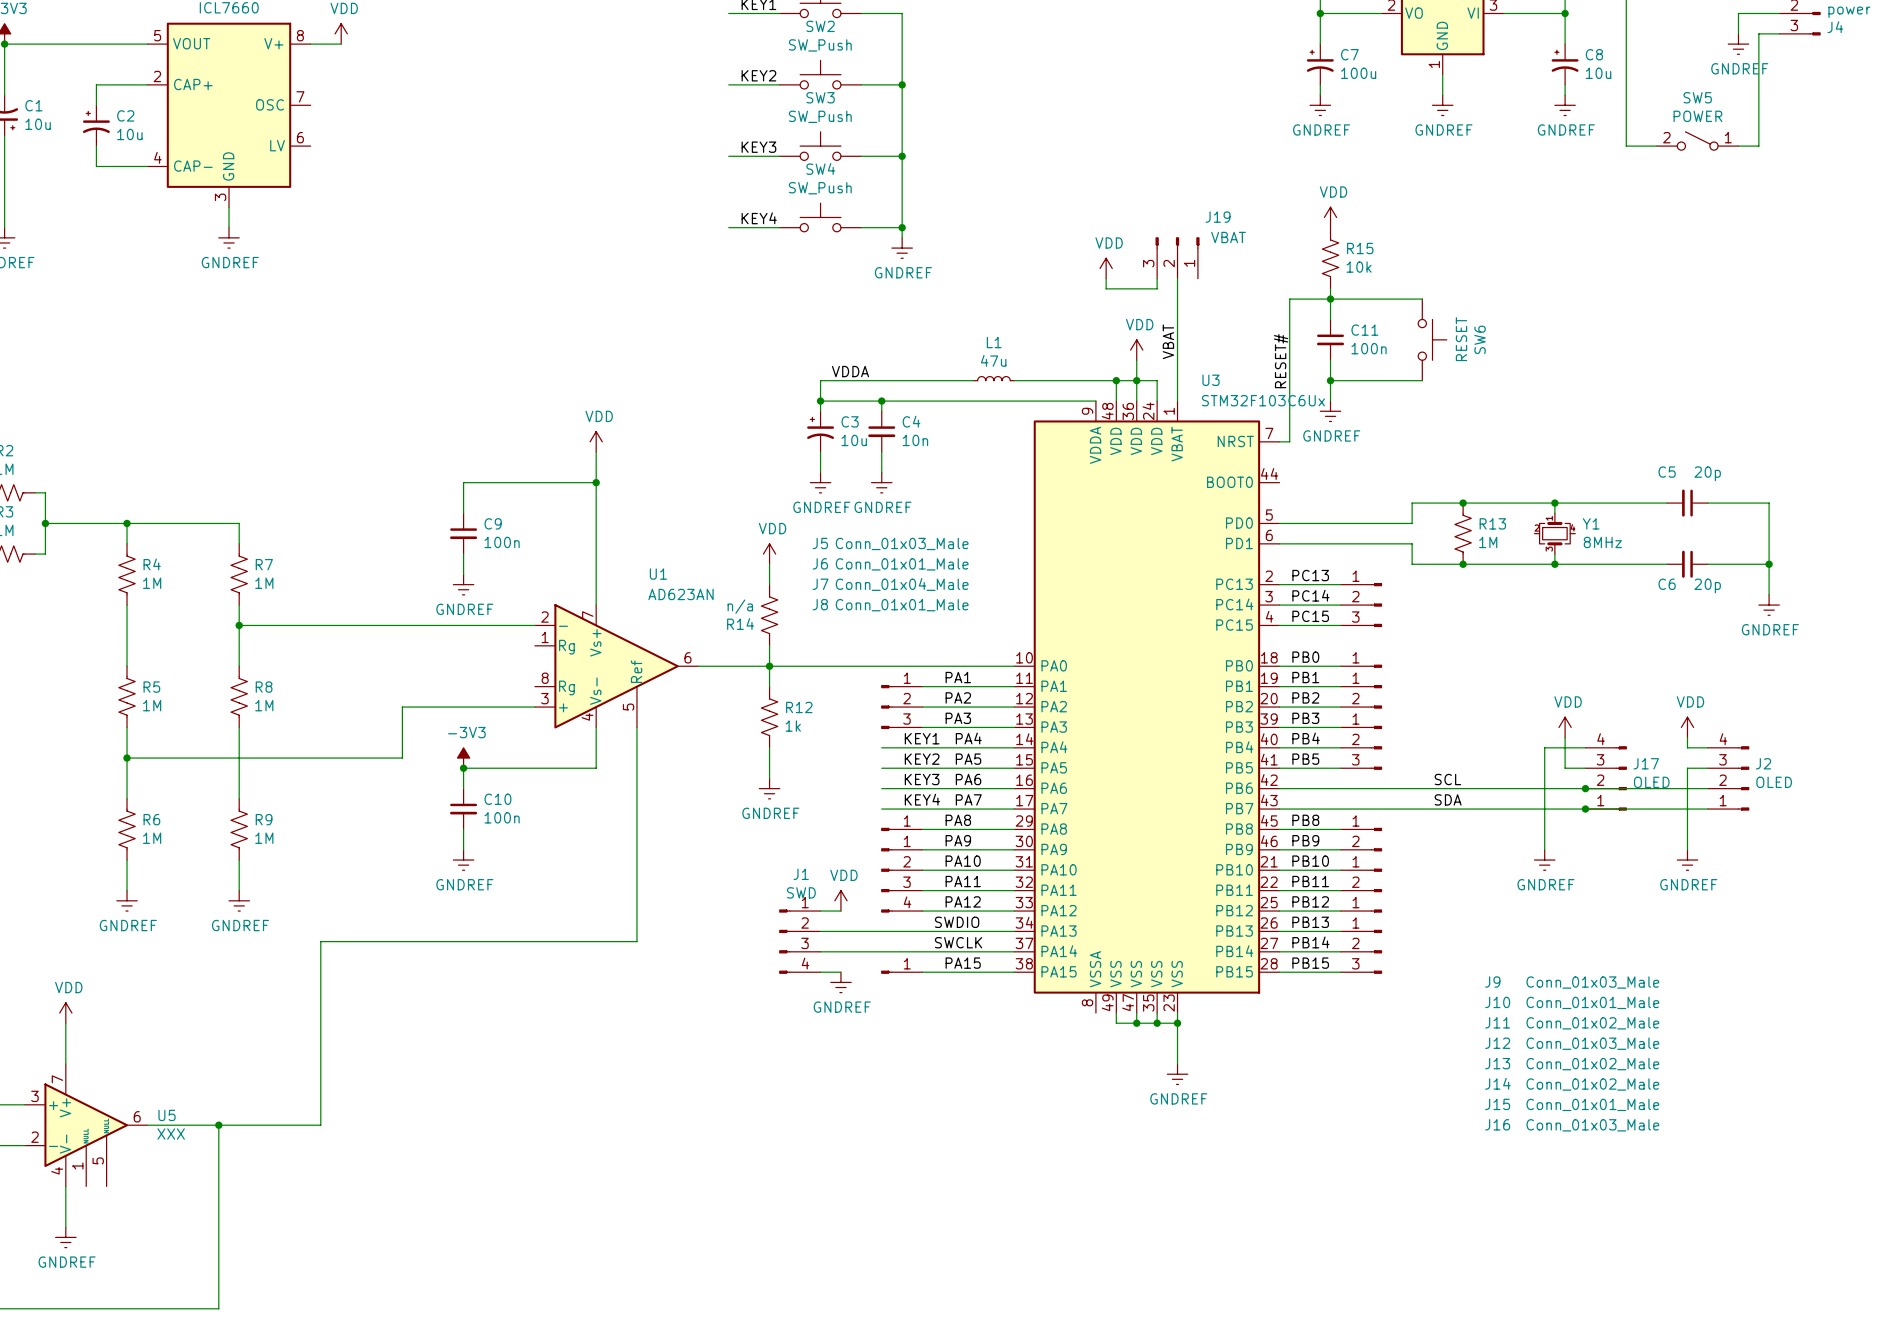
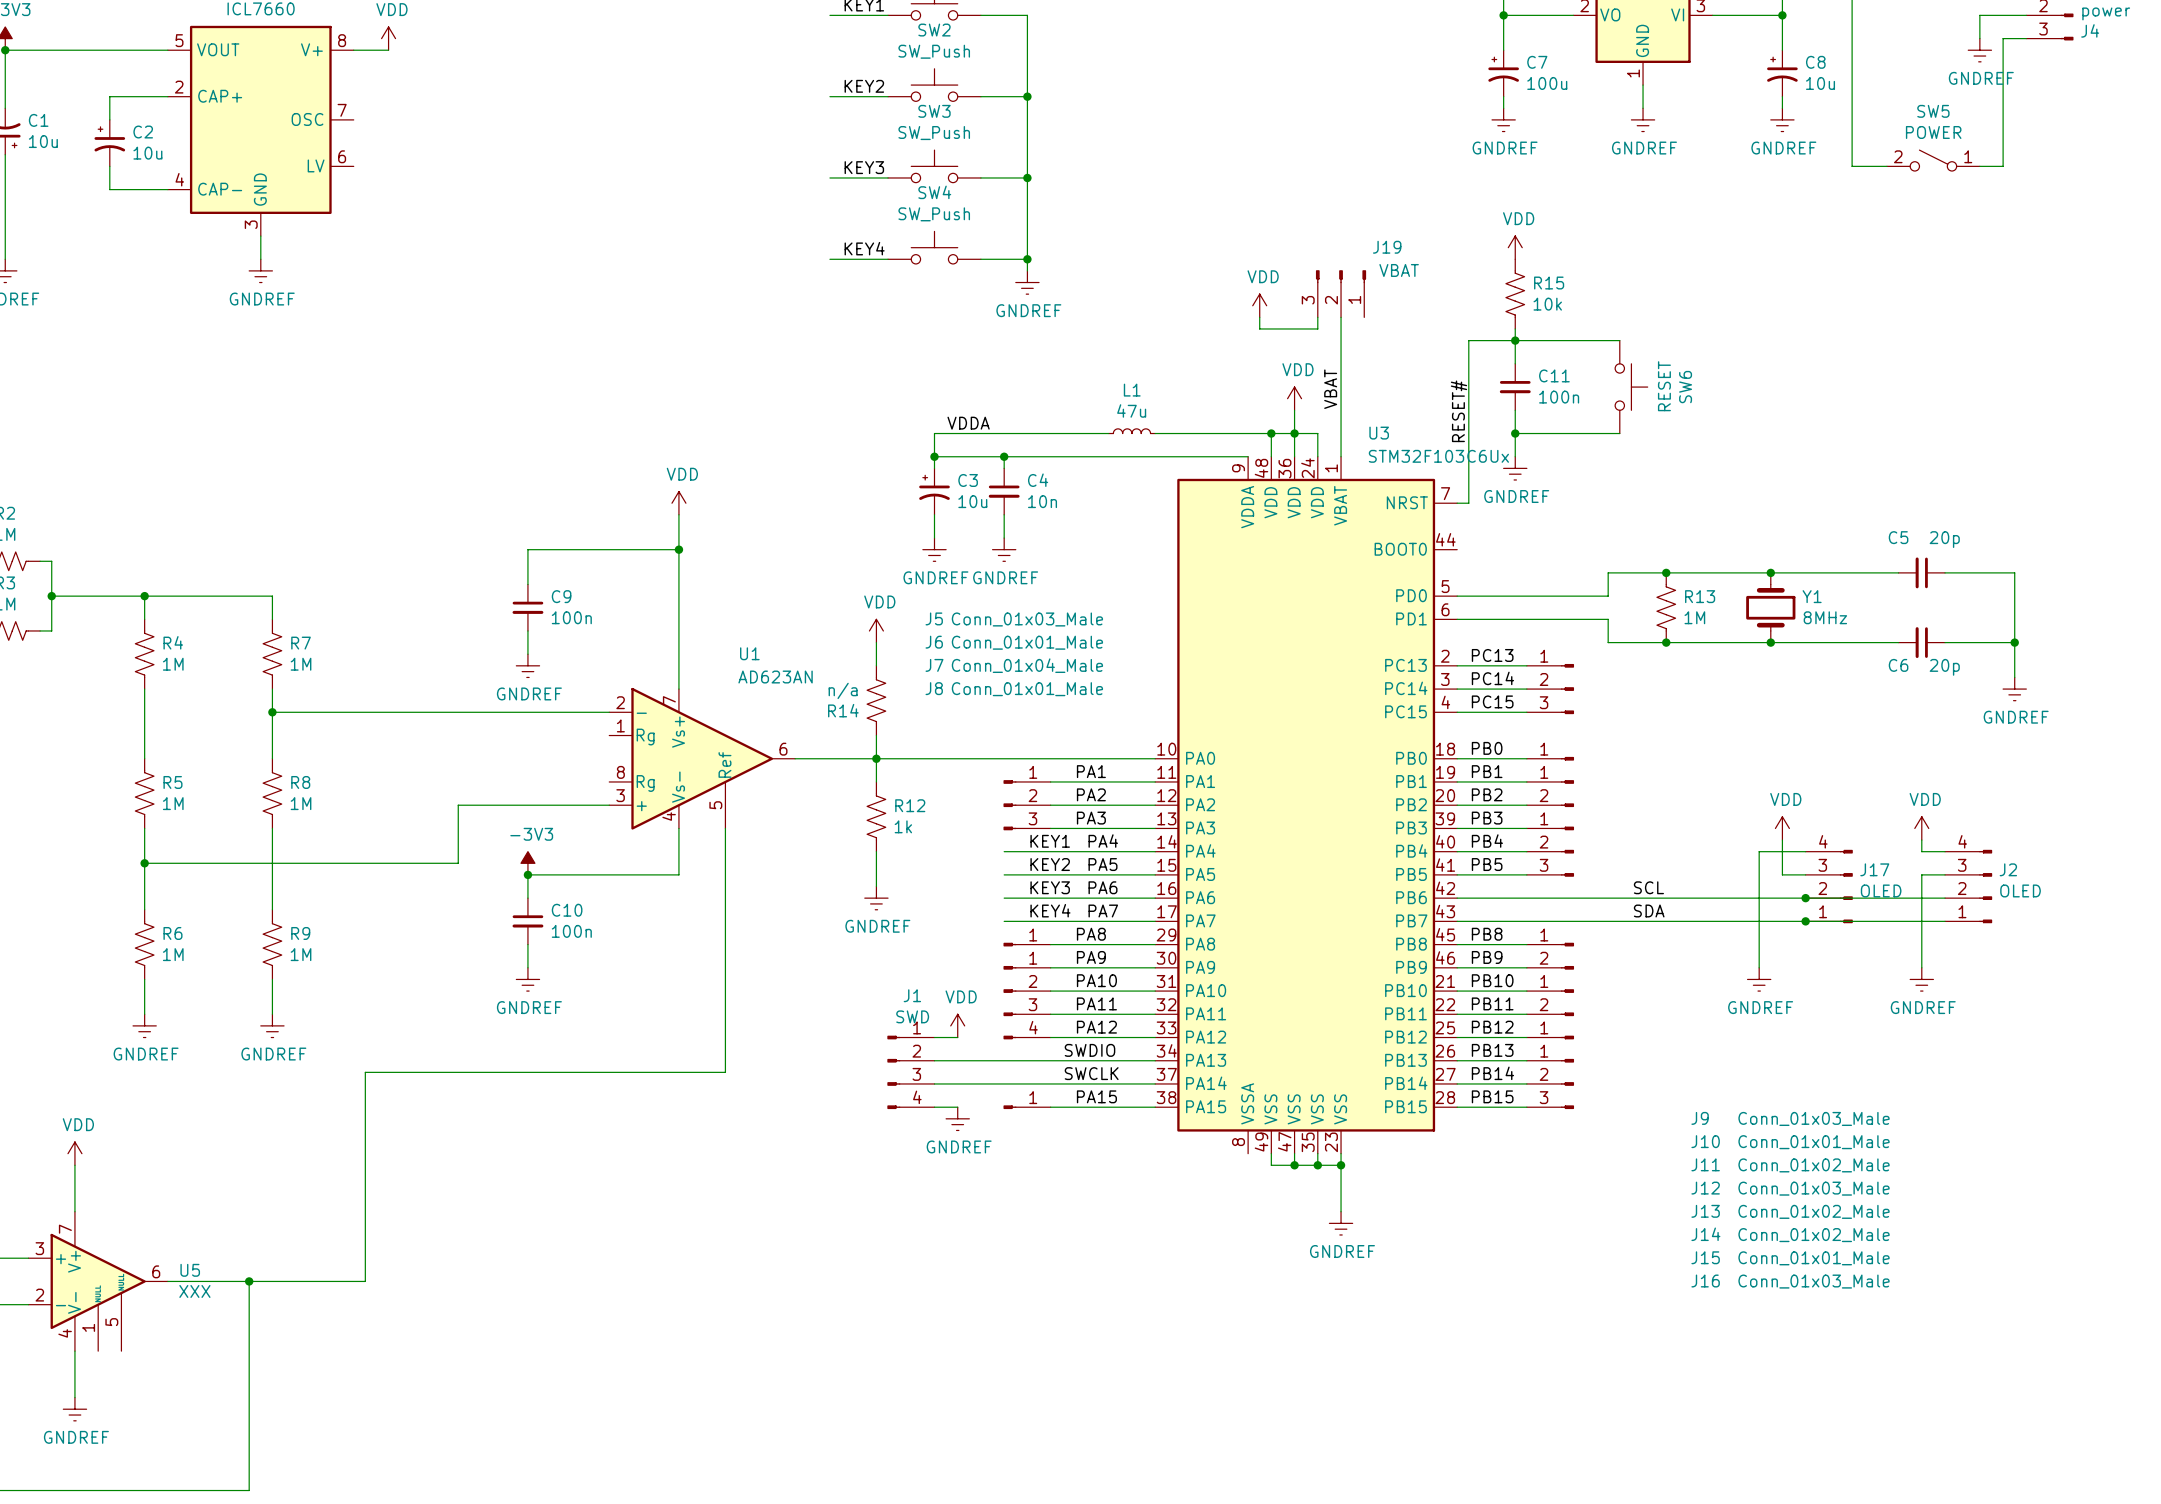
Y1 symbol: [1534, 513, 1576, 555] -> [1746, 572, 1796, 643]

